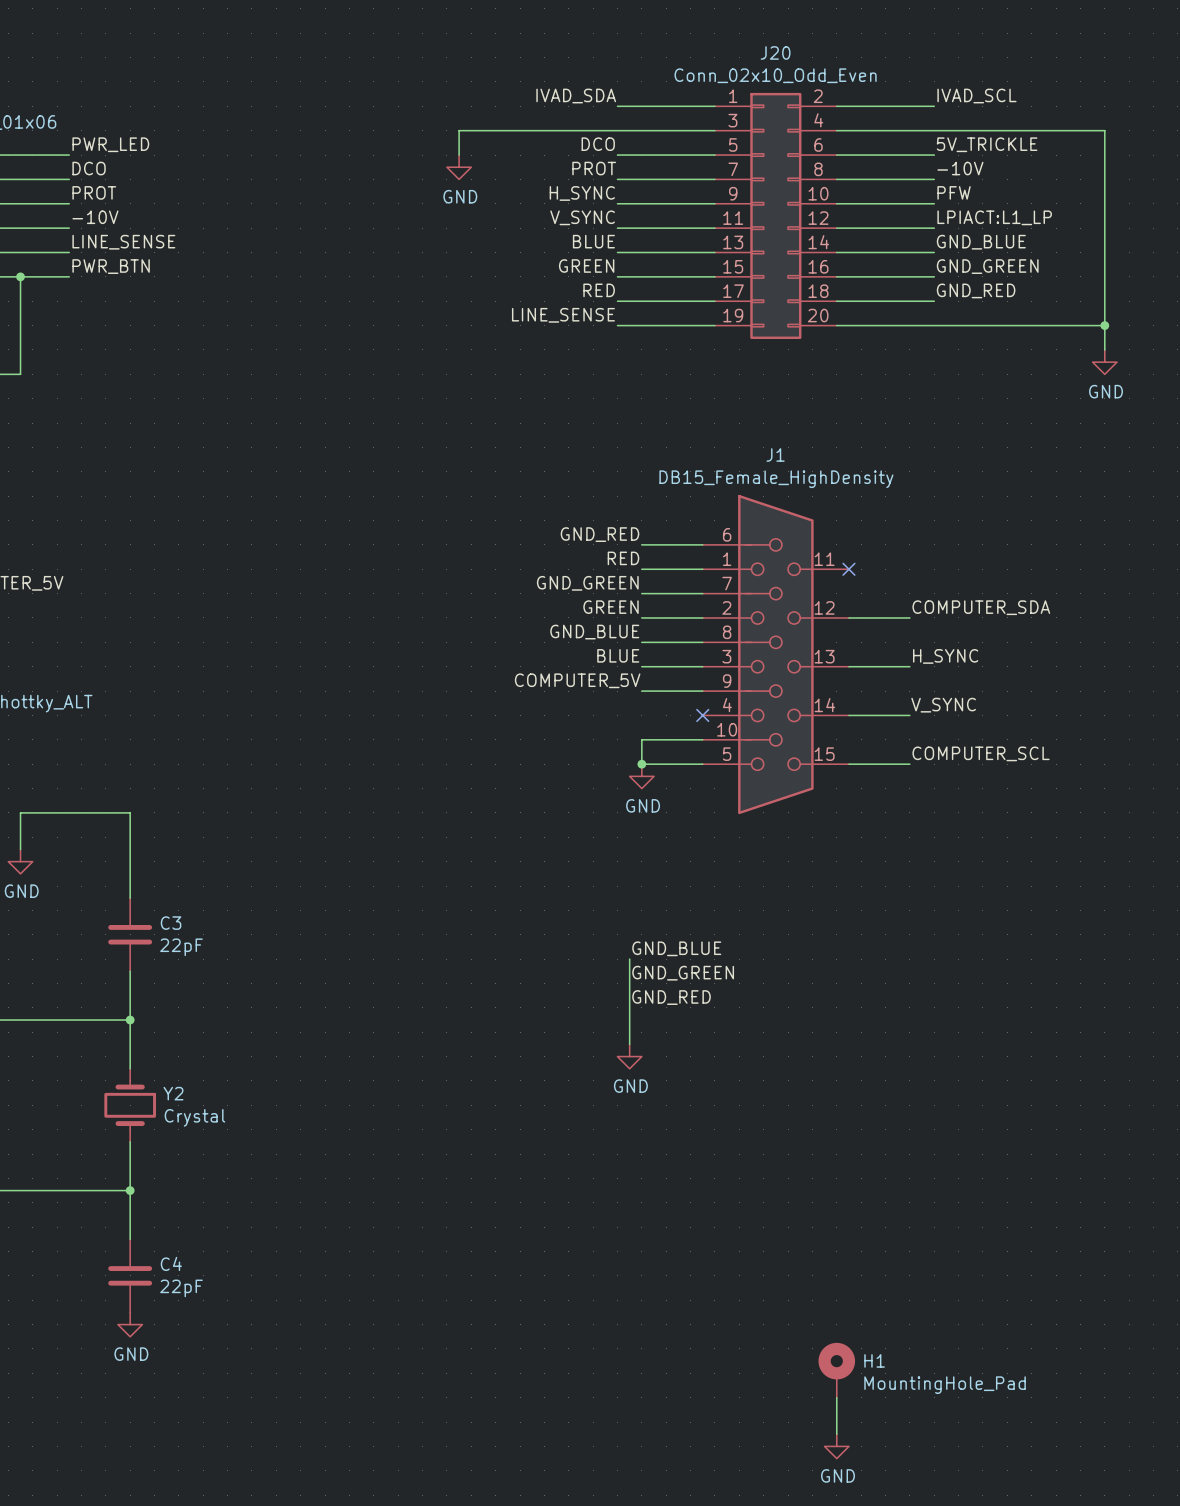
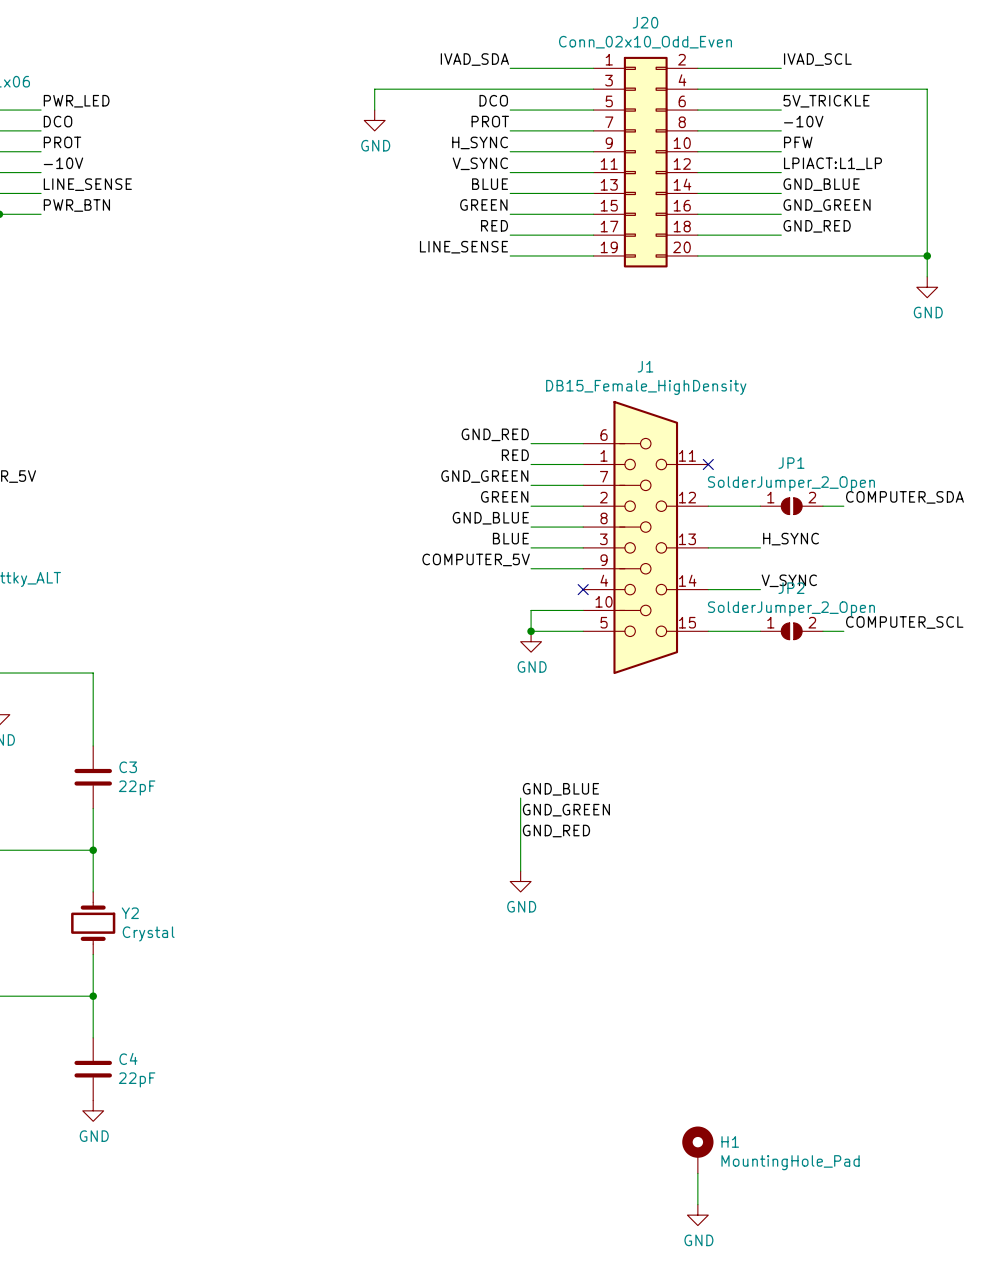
label position: COMPUTER_SDA (981, 607) -> COMPUTER_SDA (904, 497)
JP1: none -> SolderJumper_2_Open (791, 506)
wire: none -> (822, 506) (843, 506)
label position: COMPUTER_SCL (981, 753) -> COMPUTER_SCL (904, 622)
JP2: none -> SolderJumper_2_Open (791, 631)
wire: none -> (822, 631) (843, 631)

